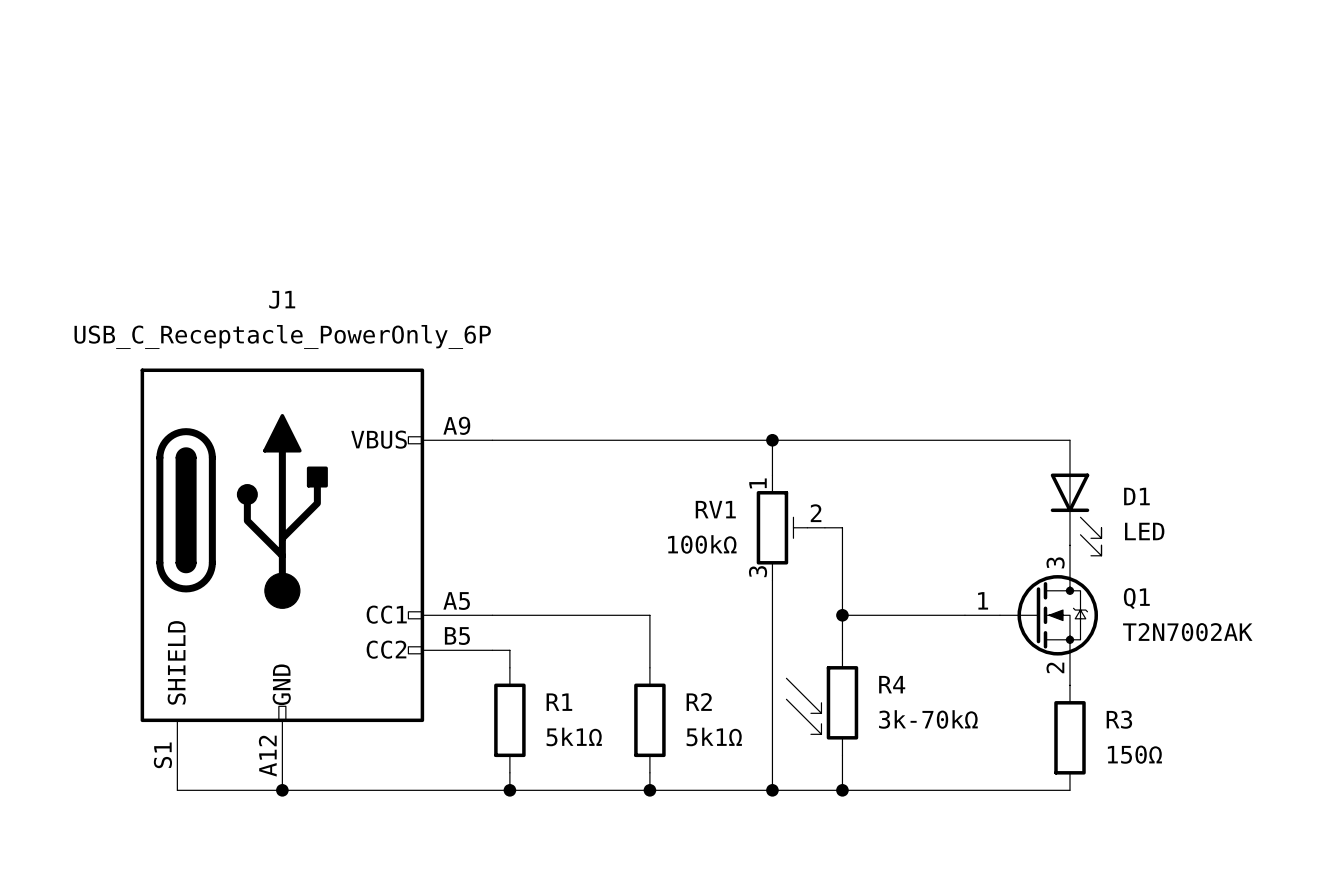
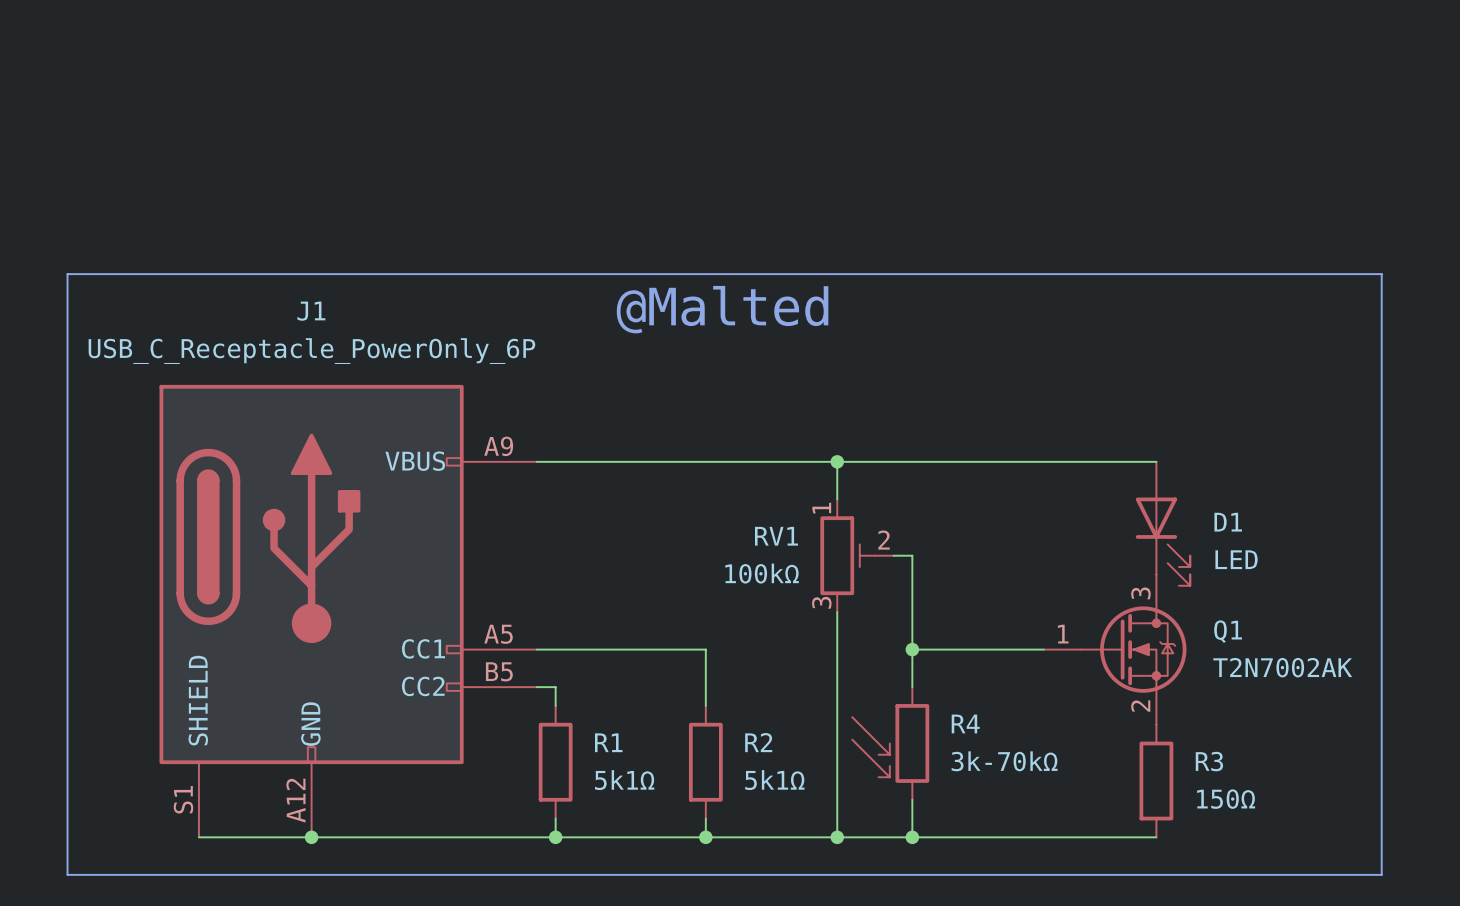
line: none -> (67, 274) (1381, 274) (1381, 874) (67, 874) (67, 274)
text: none -> @Malted (722, 309)

